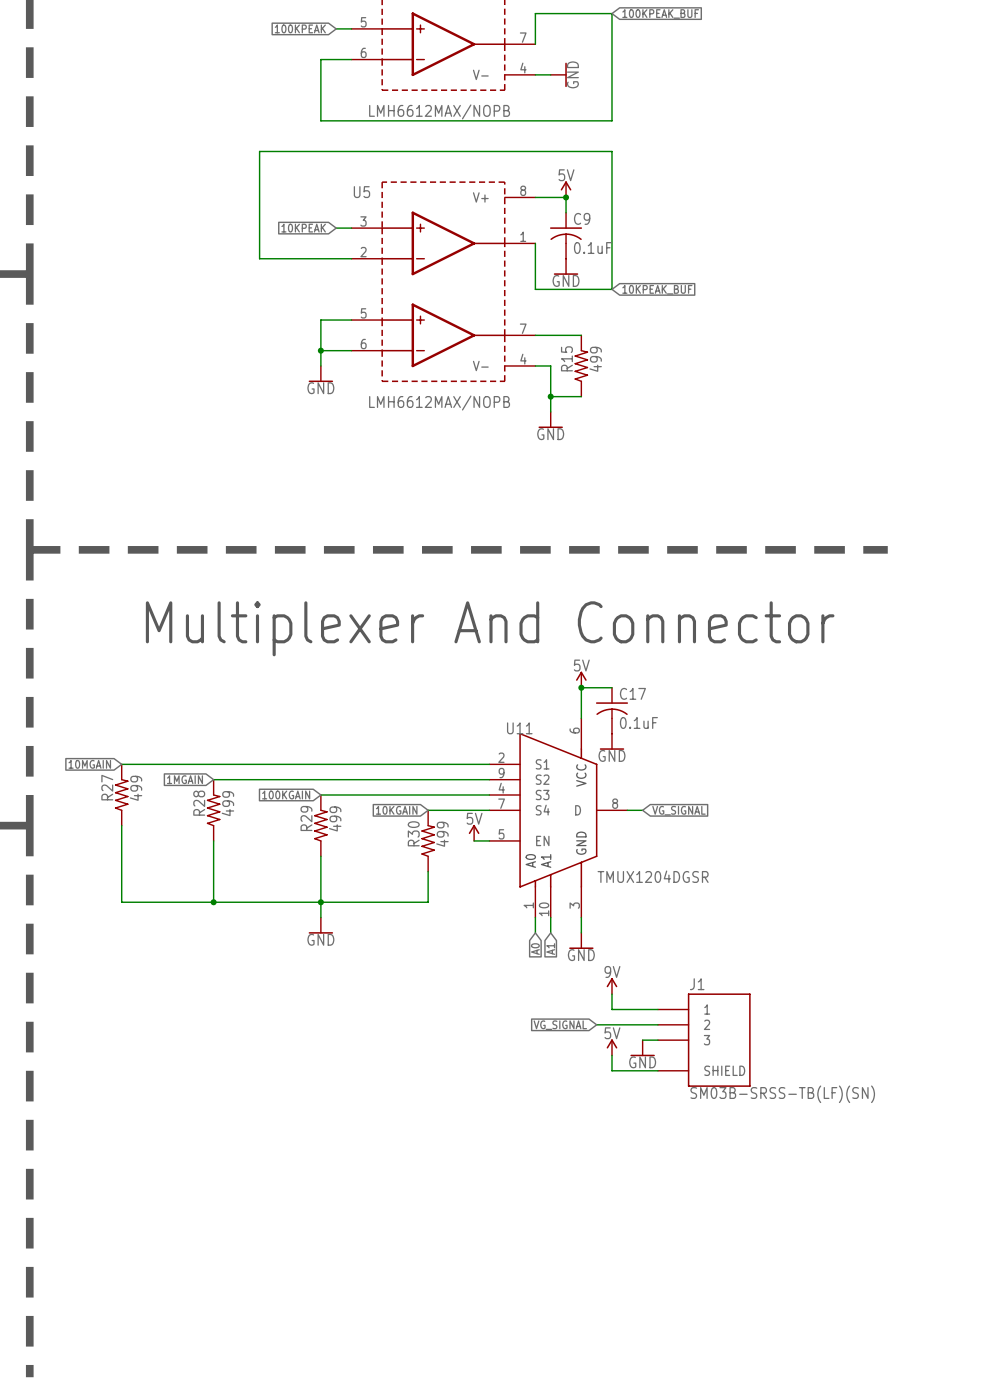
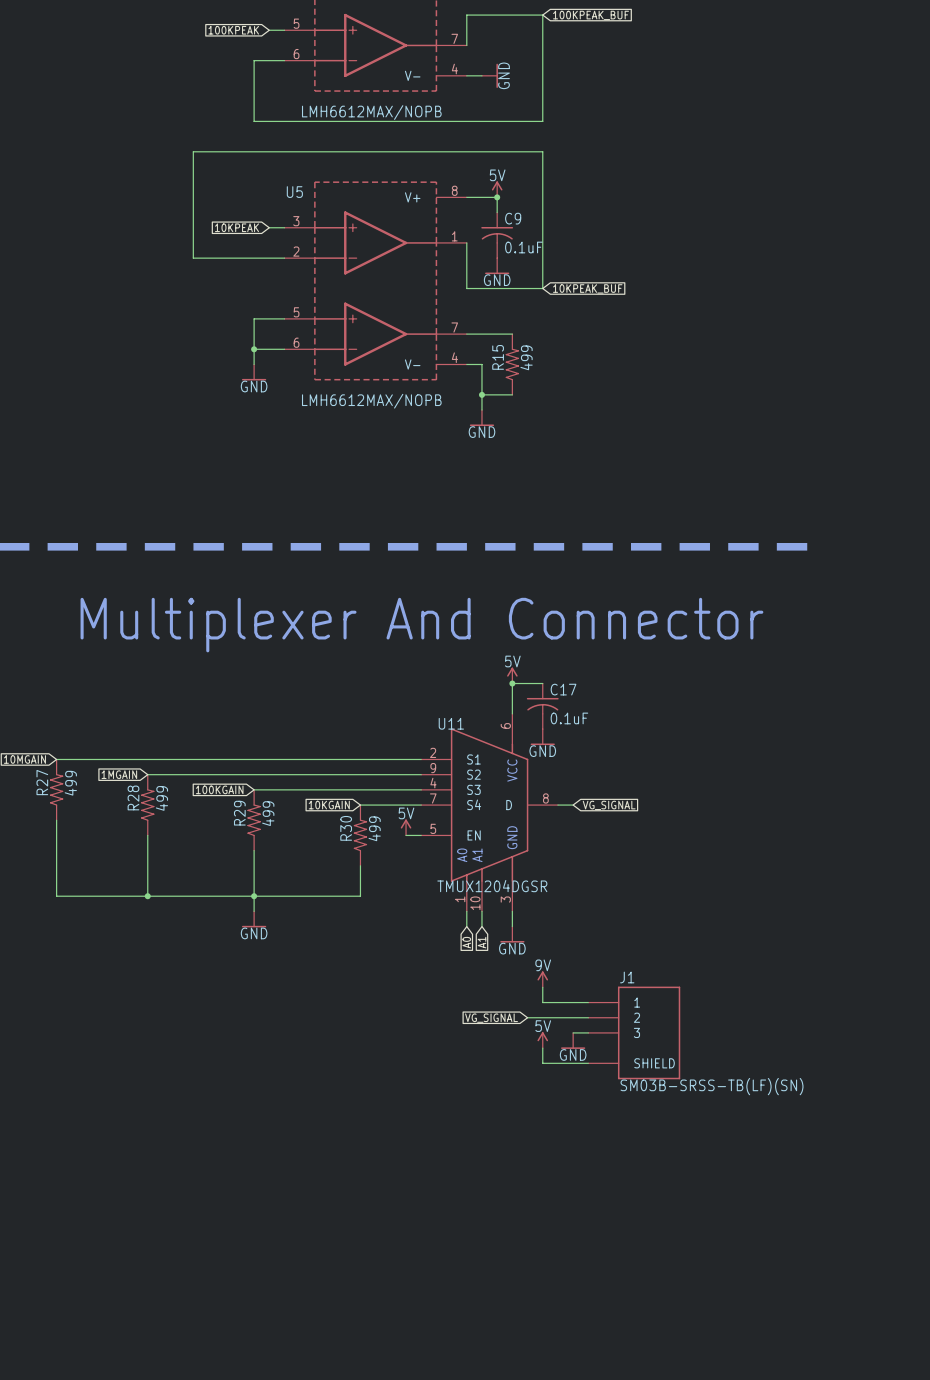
U11 value position: TMUX1204DGSR (653, 876) -> TMUX1204DGSR (492, 886)

